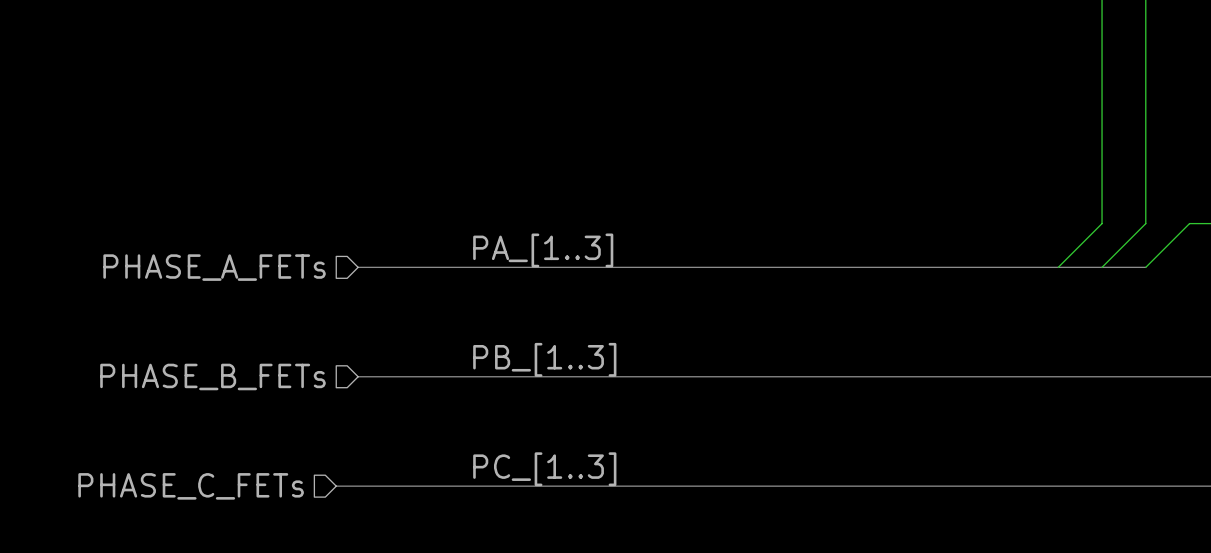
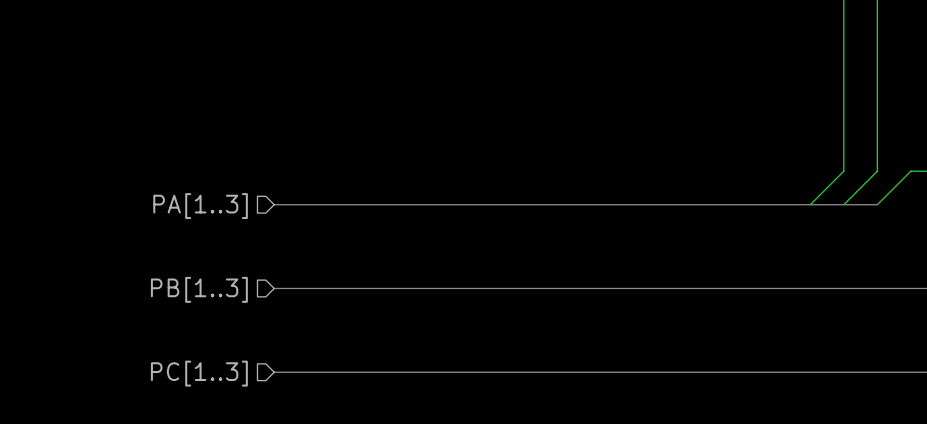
label: PA_[1..3] (543, 250) -> none
hierarchical label: PHASE_A_FETs (214, 267) -> PA[1..3] (200, 206)
label: PB_[1..3] (544, 359) -> none
hierarchical label: PHASE_B_FETs (212, 376) -> PB[1..3] (199, 289)
label: PC_[1..3] (544, 469) -> none
hierarchical label: PHASE_C_FETs (191, 486) -> none
bus: (336, 486) (358, 486) -> none
hierarchical label: none -> PC[1..3] (199, 373)

